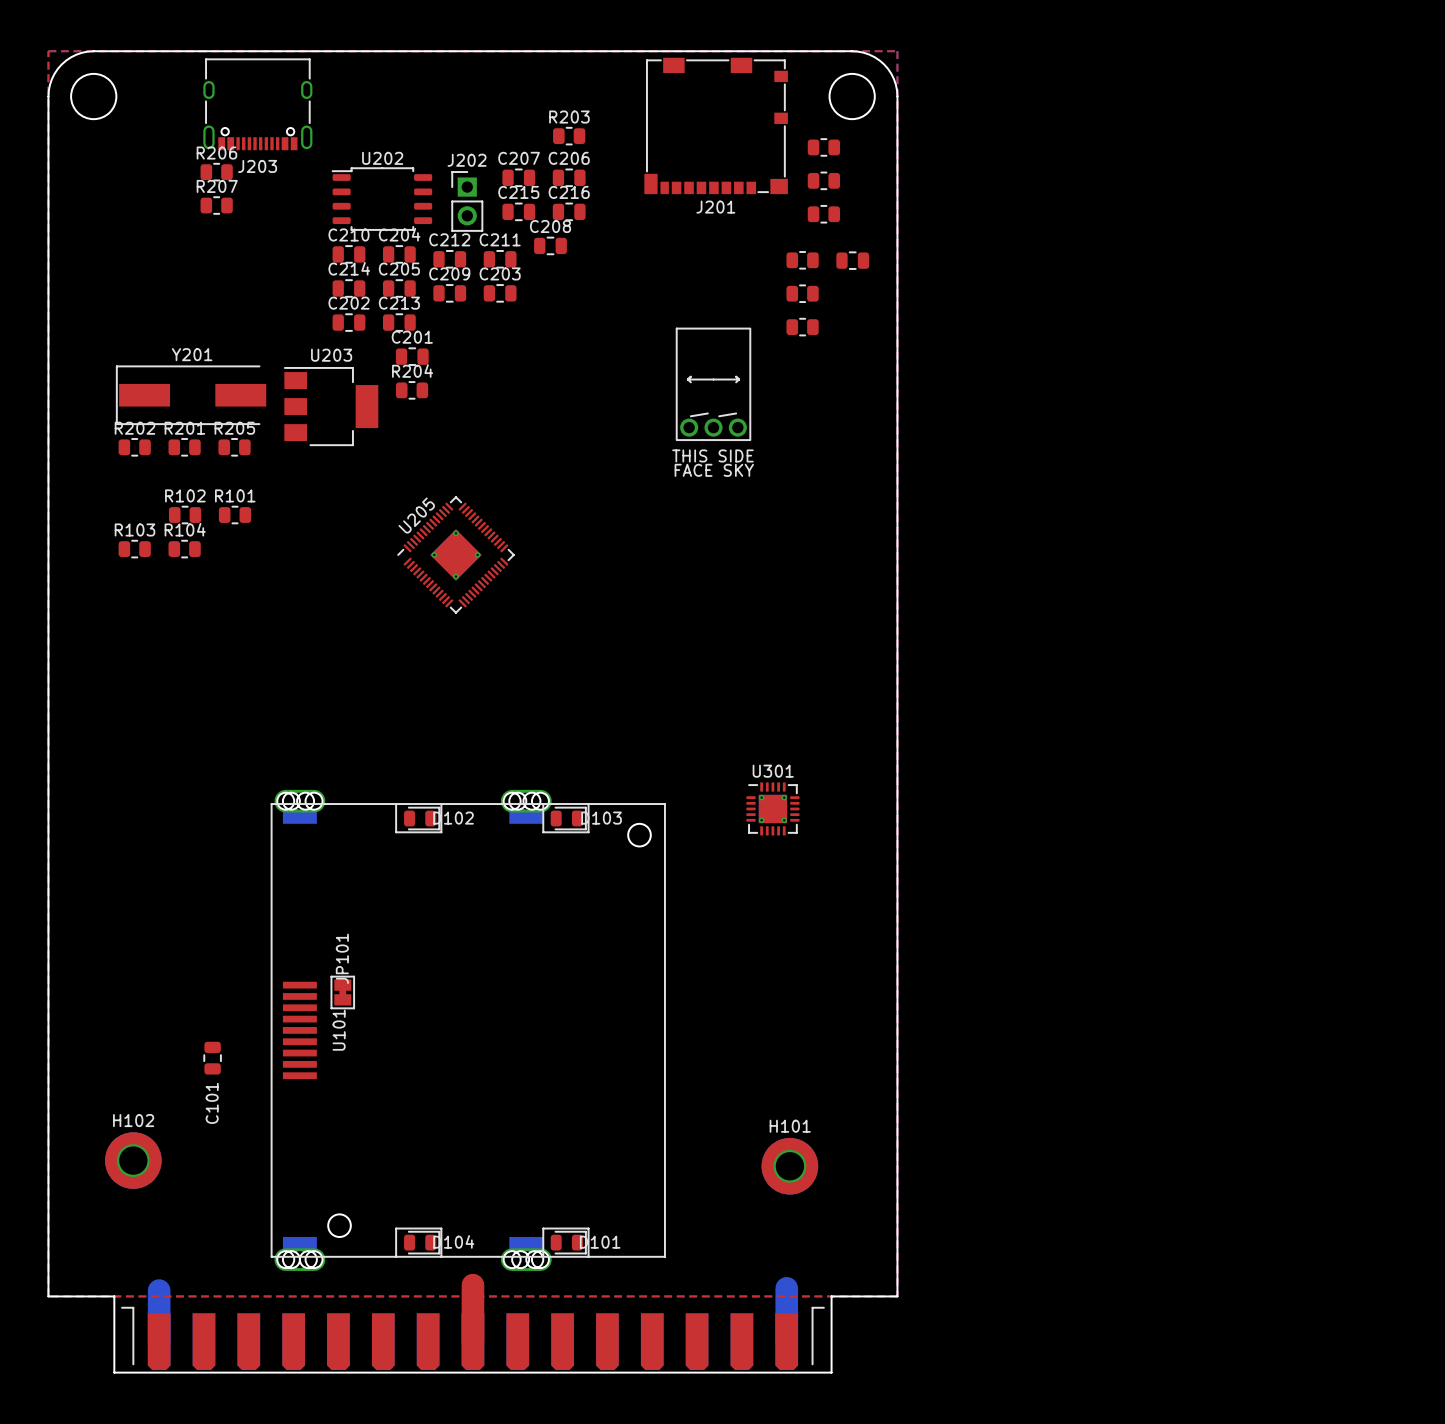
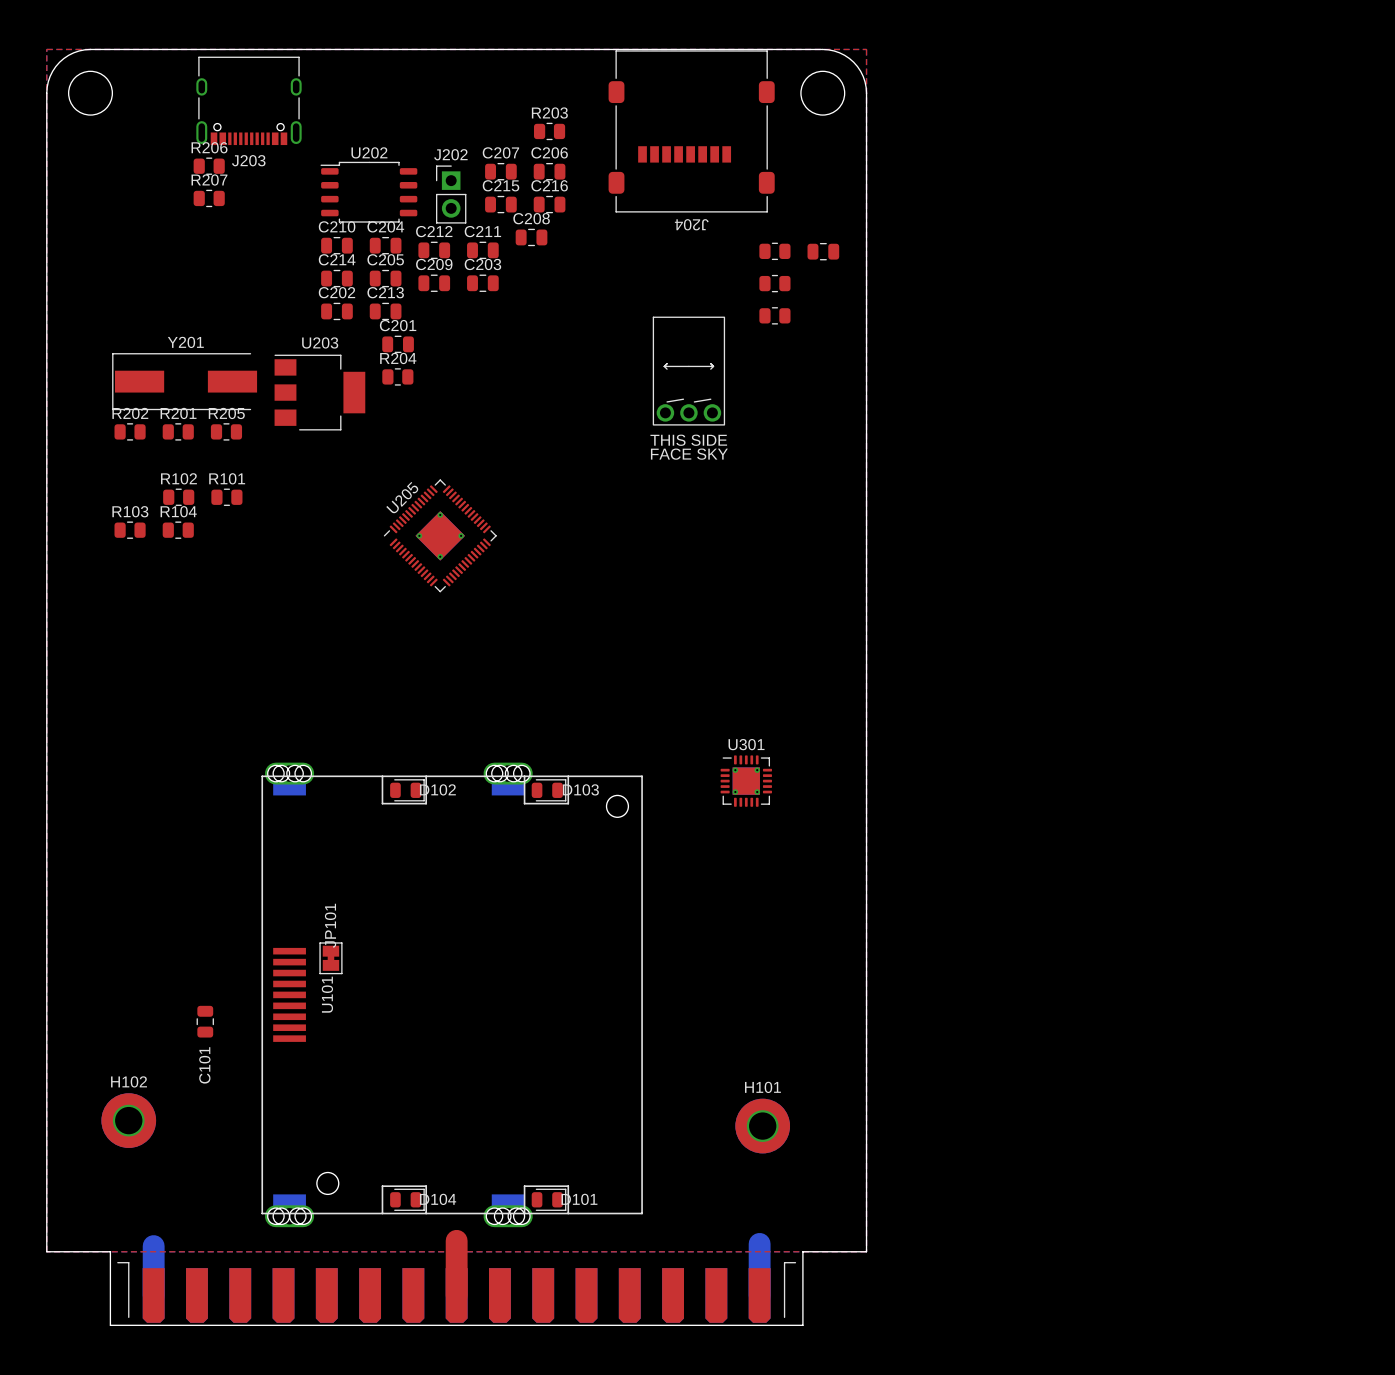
J201: (716, 125) -> none
J204: none -> (691, 131)
part: (823, 147) -> none
part: (823, 180) -> none
part: (823, 214) -> none

